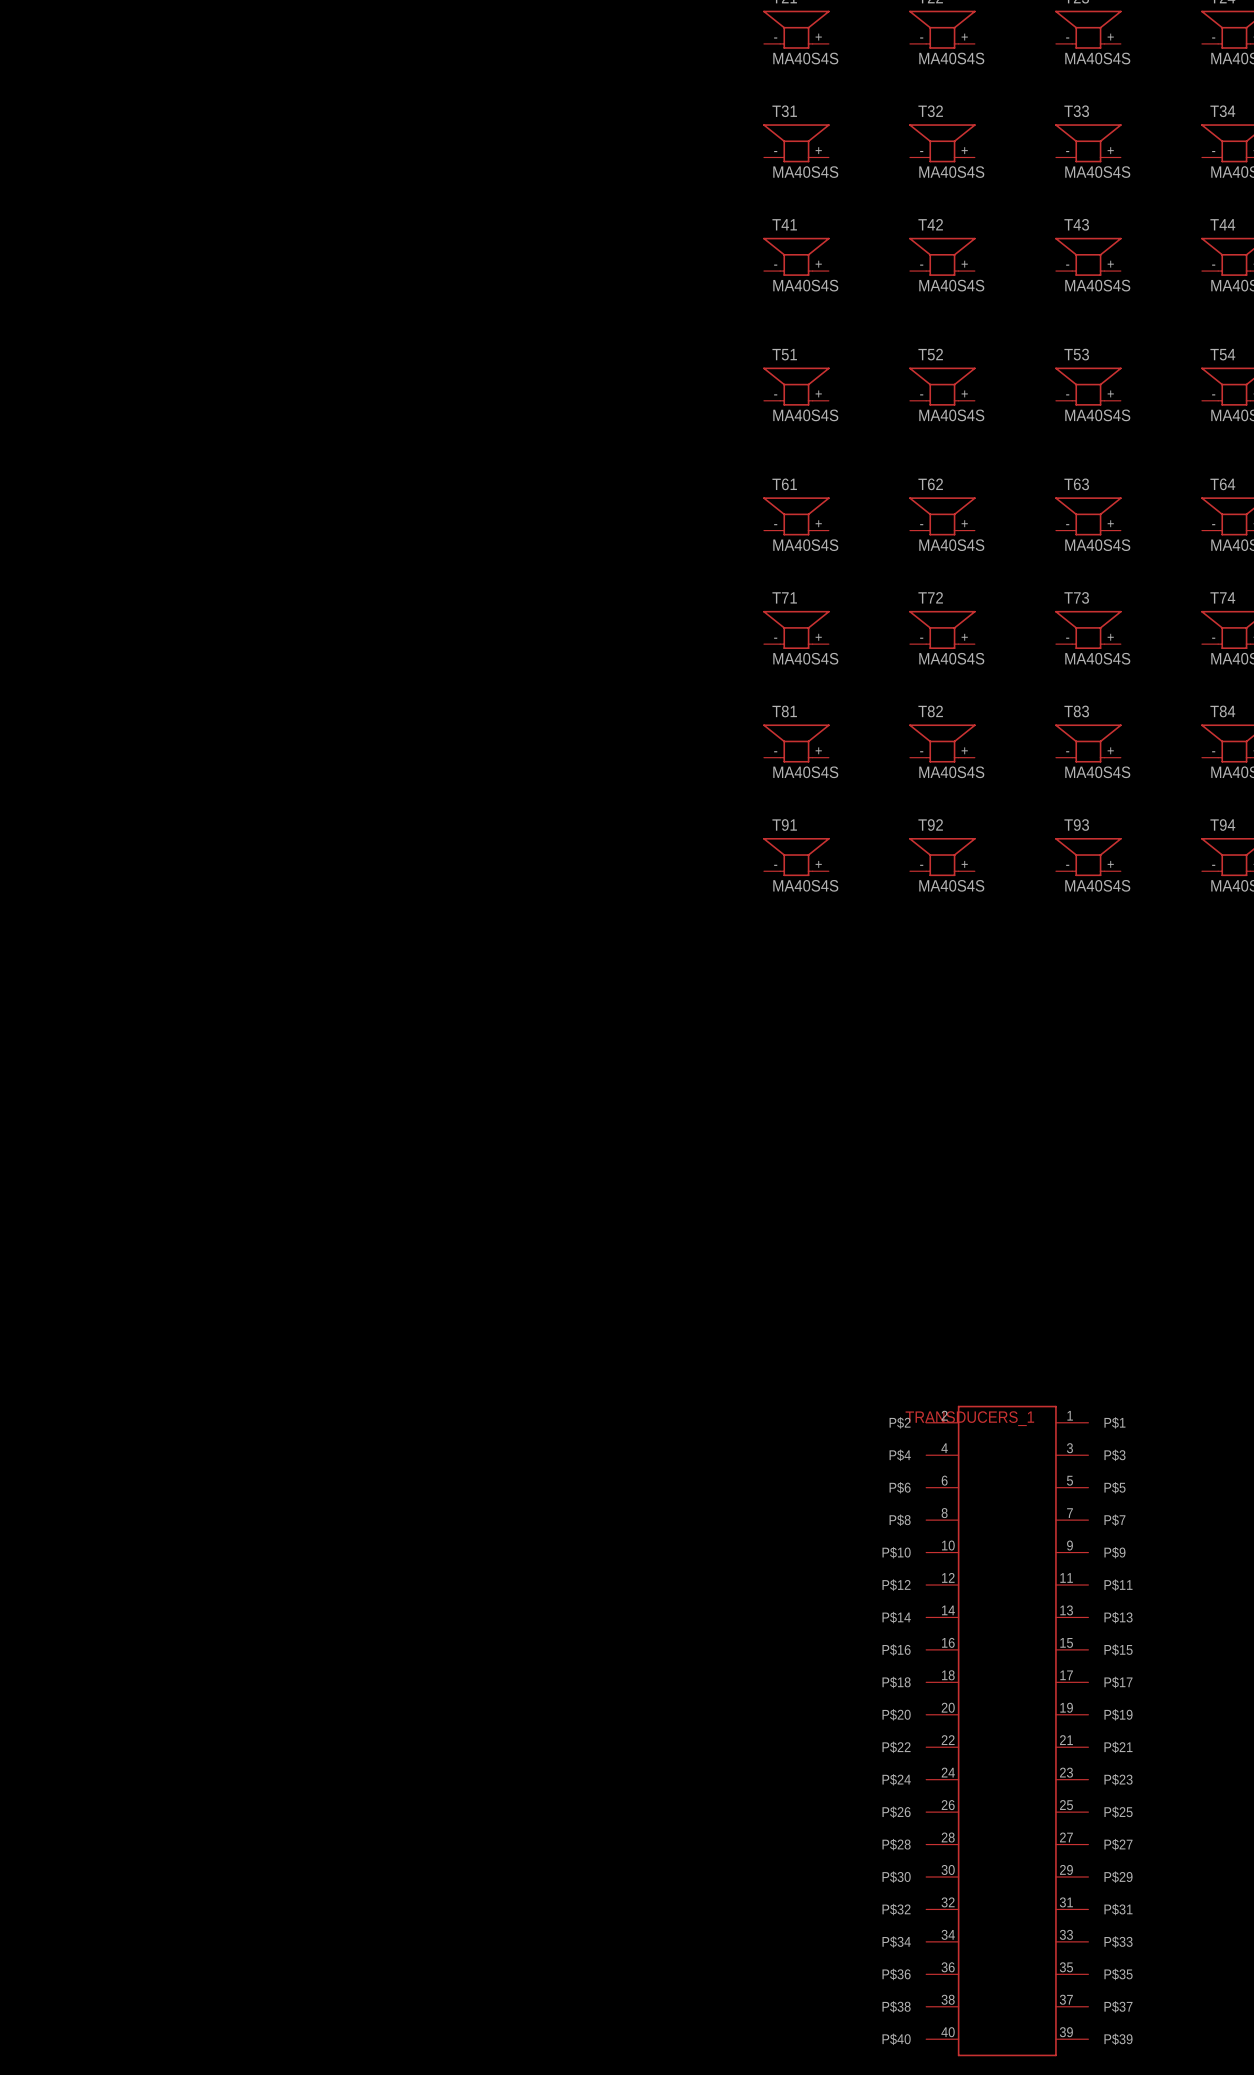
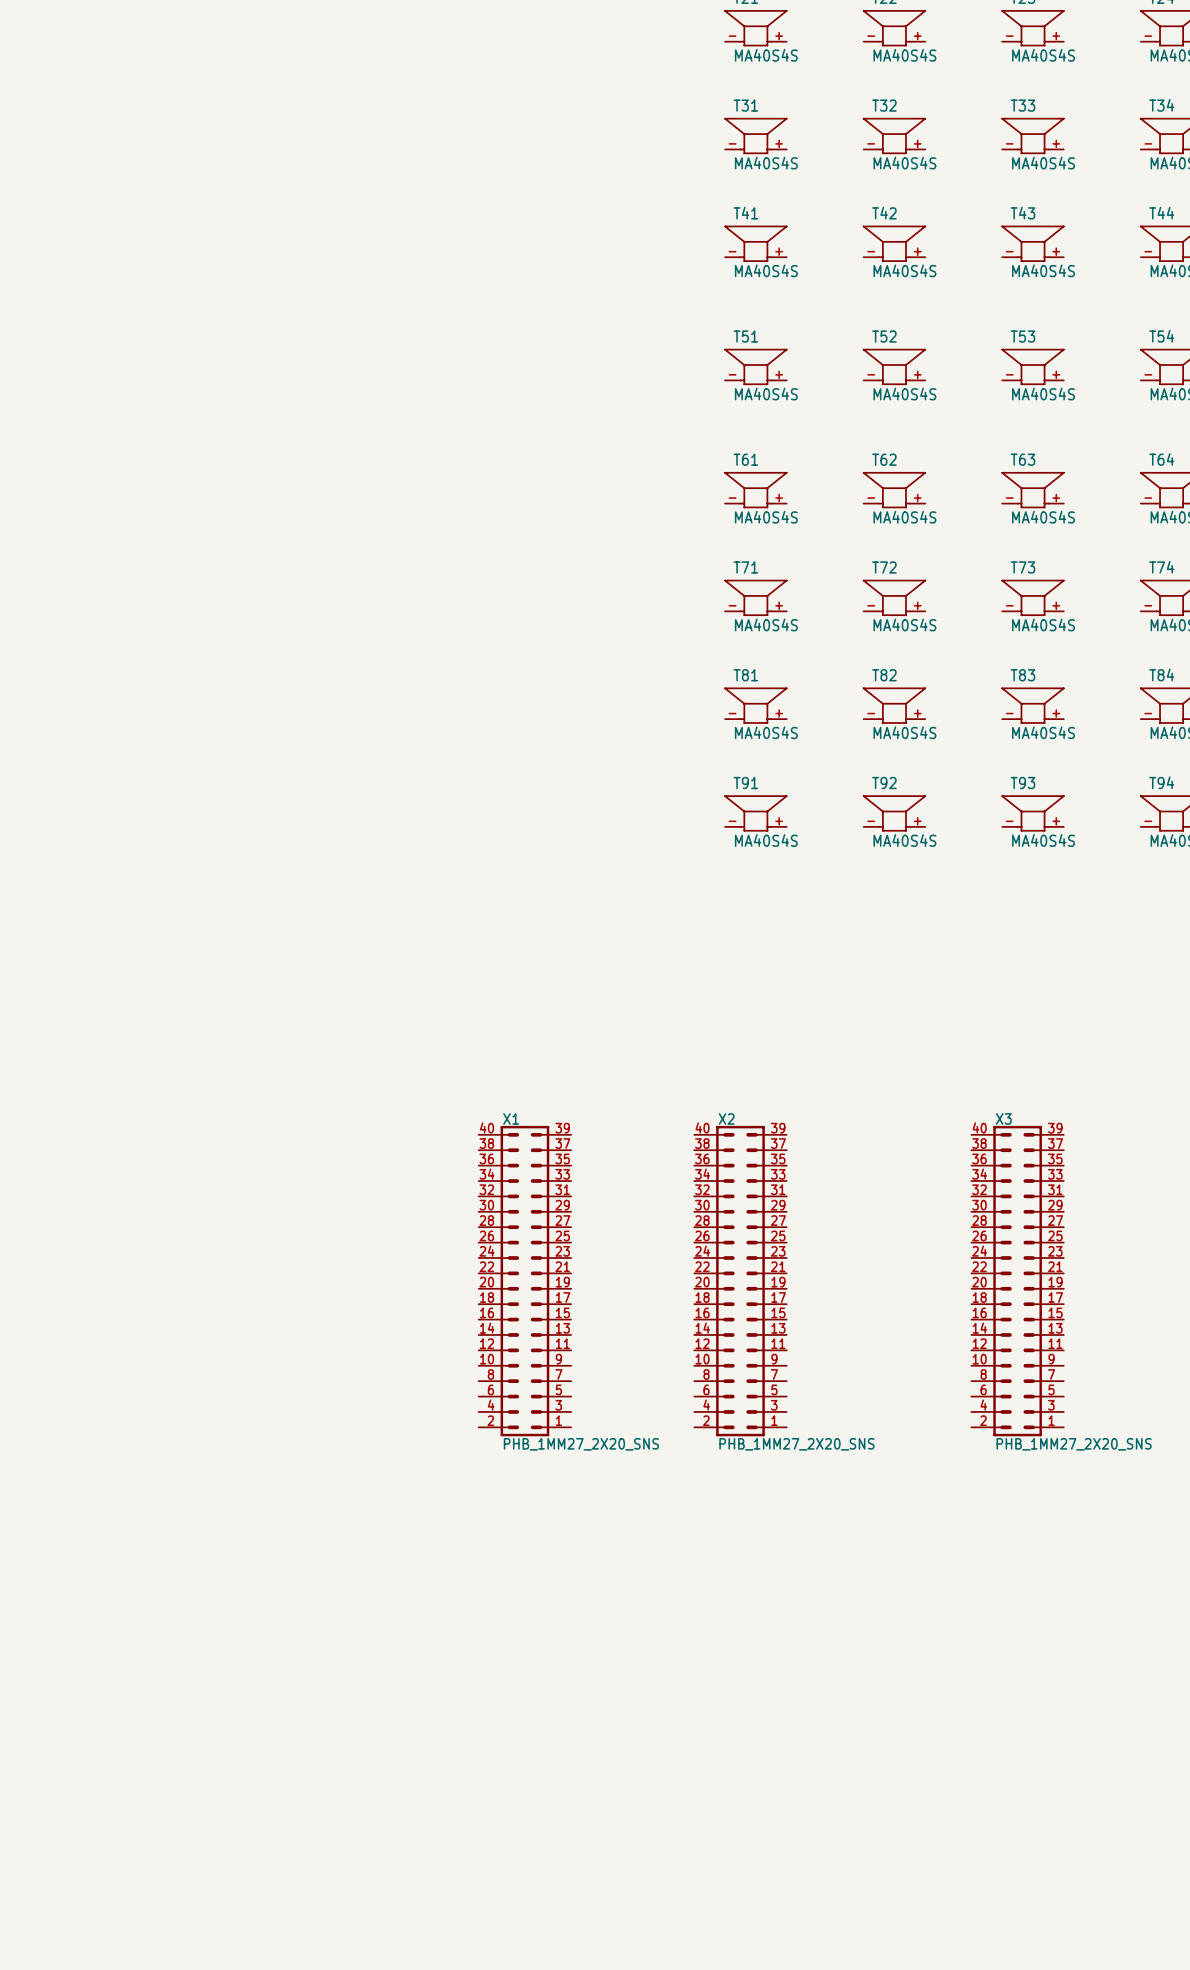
X1: none -> PHB_1MM27_2X20_SNS (524, 1281)
X2: none -> PHB_1MM27_2X20_SNS (740, 1281)
X3: none -> PHB_1MM27_2X20_SNS (1017, 1281)
TRANSDUCERS_1: (1007, 1731) -> none

